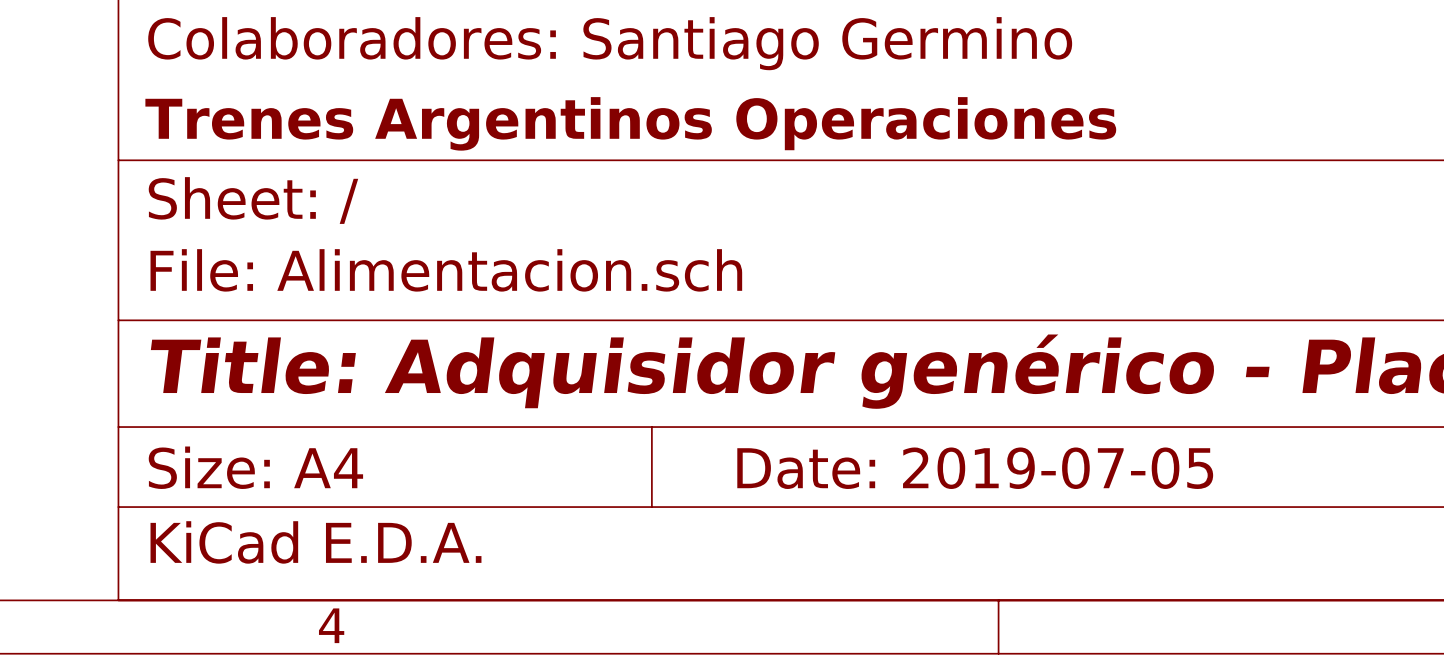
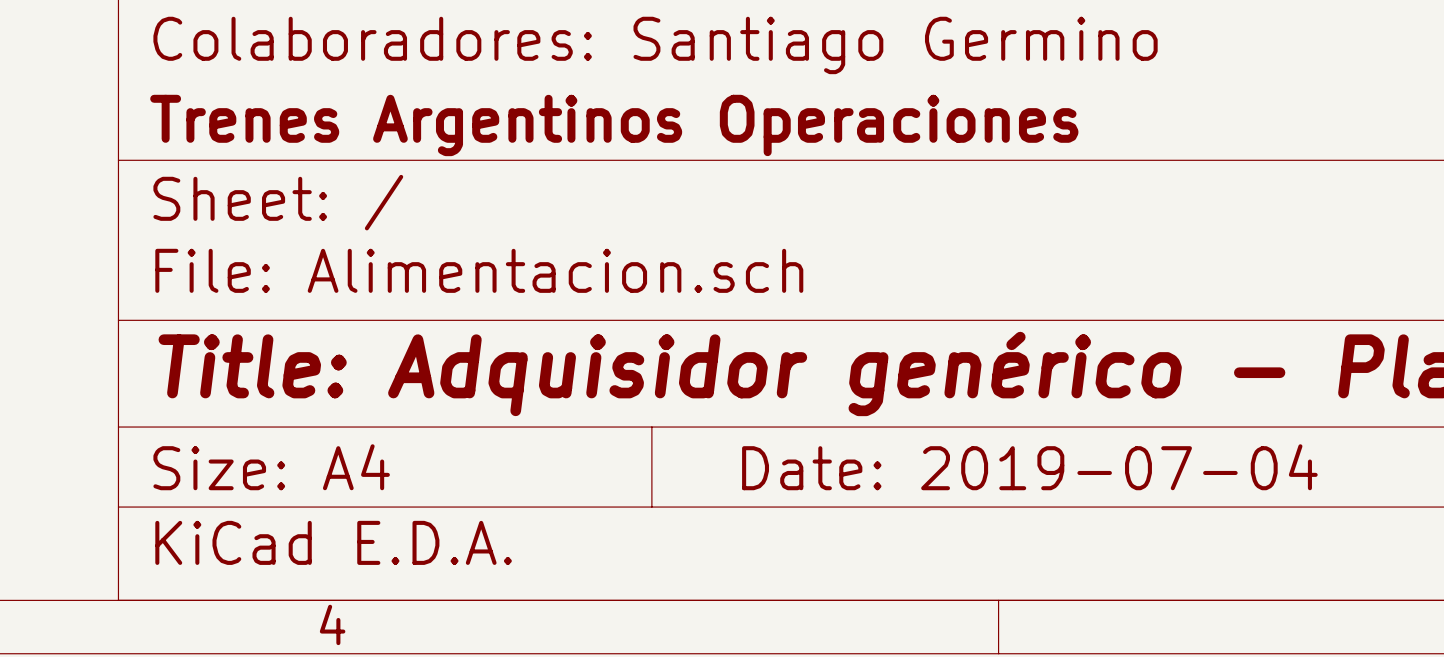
title block: Date: 2019-07-05 (975, 468) -> Date: 2019-07-04 (1029, 467)

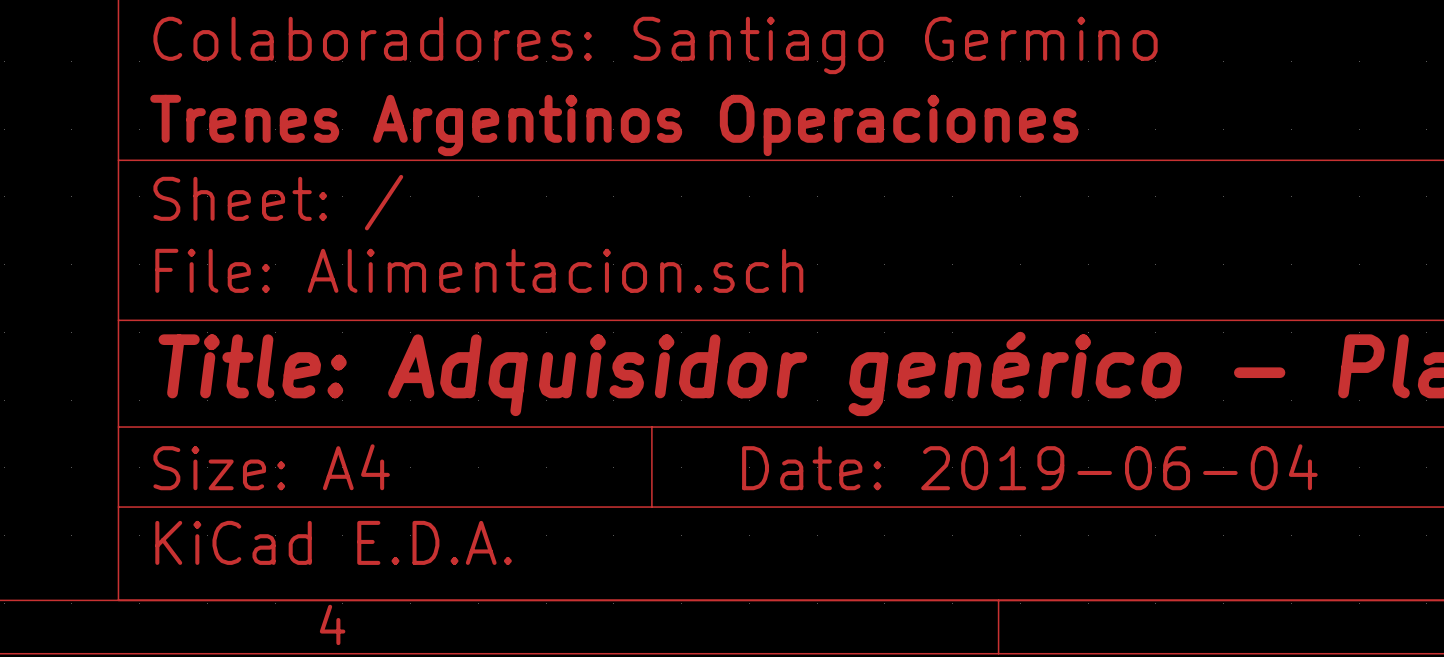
title block: Date: 2019-07-04 (1029, 467) -> Date: 2019-06-04 (1029, 467)

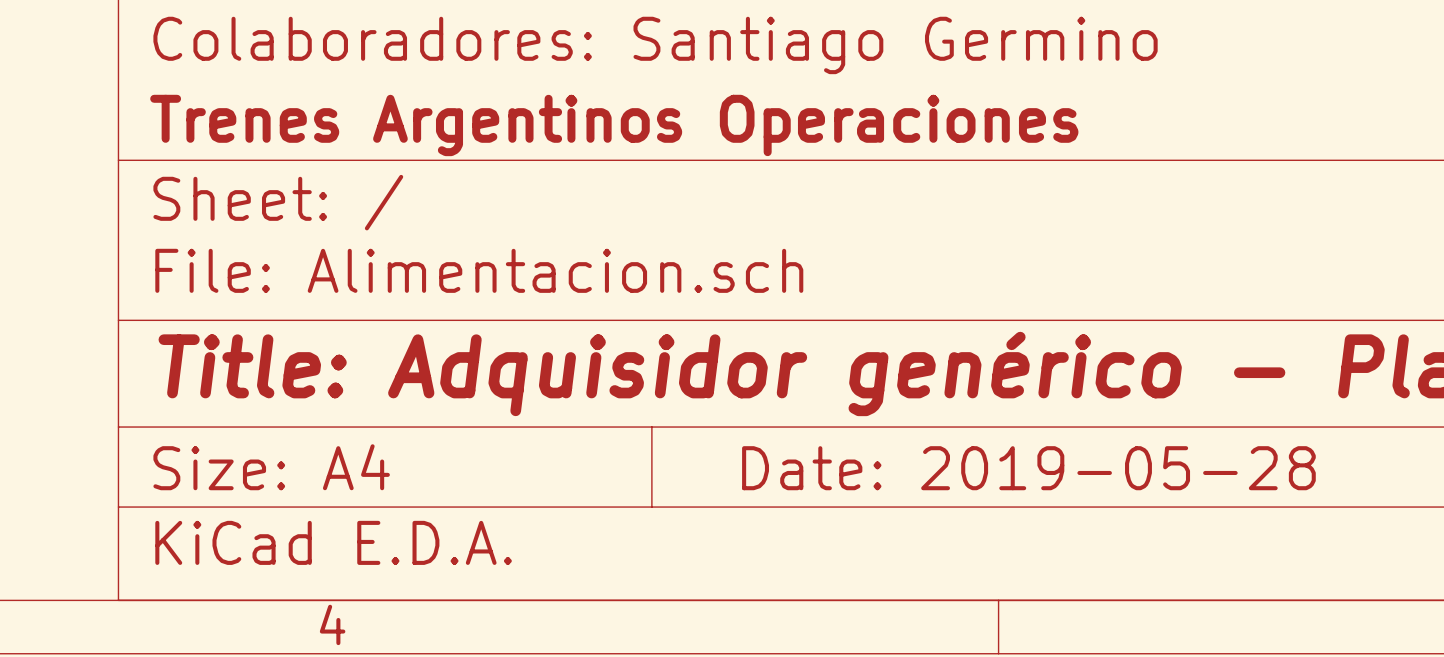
title block: Date: 2019-06-04 (1029, 467) -> Date: 2019-05-28 (1028, 468)

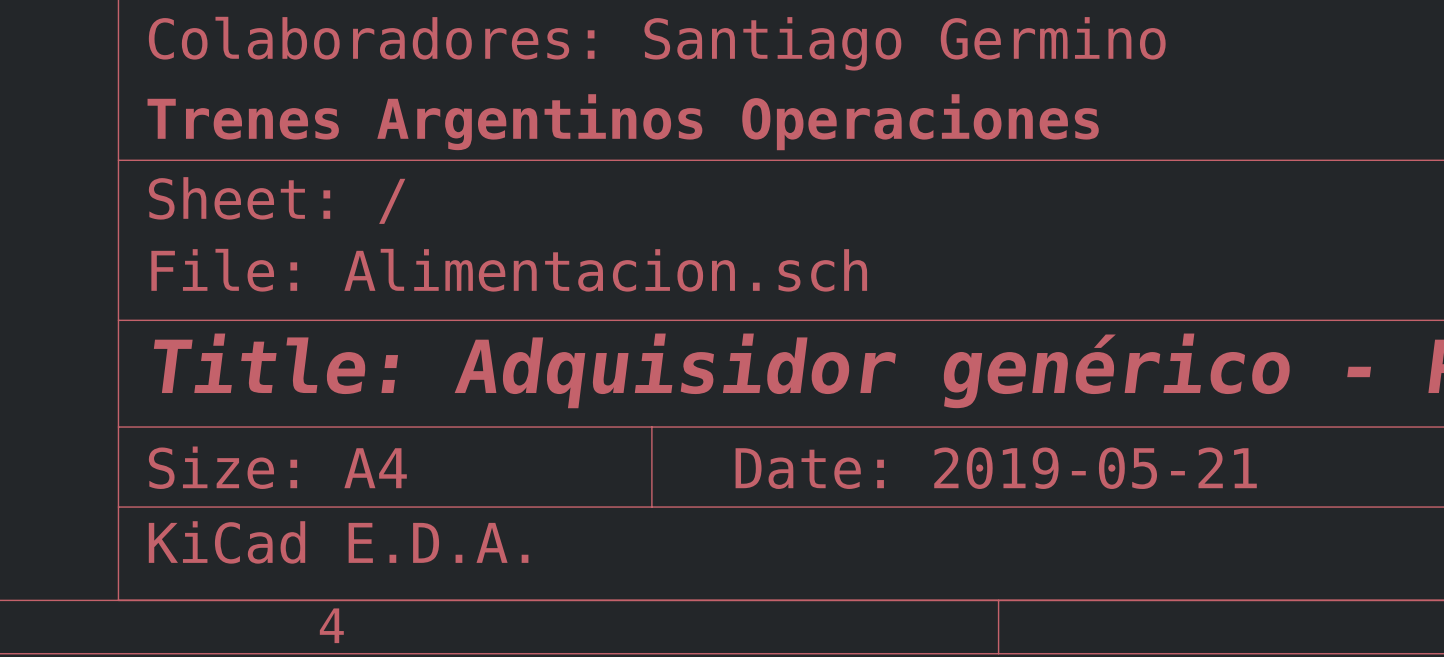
title block: Date: 2019-05-28 (1028, 468) -> Date: 2019-05-21 (996, 468)

